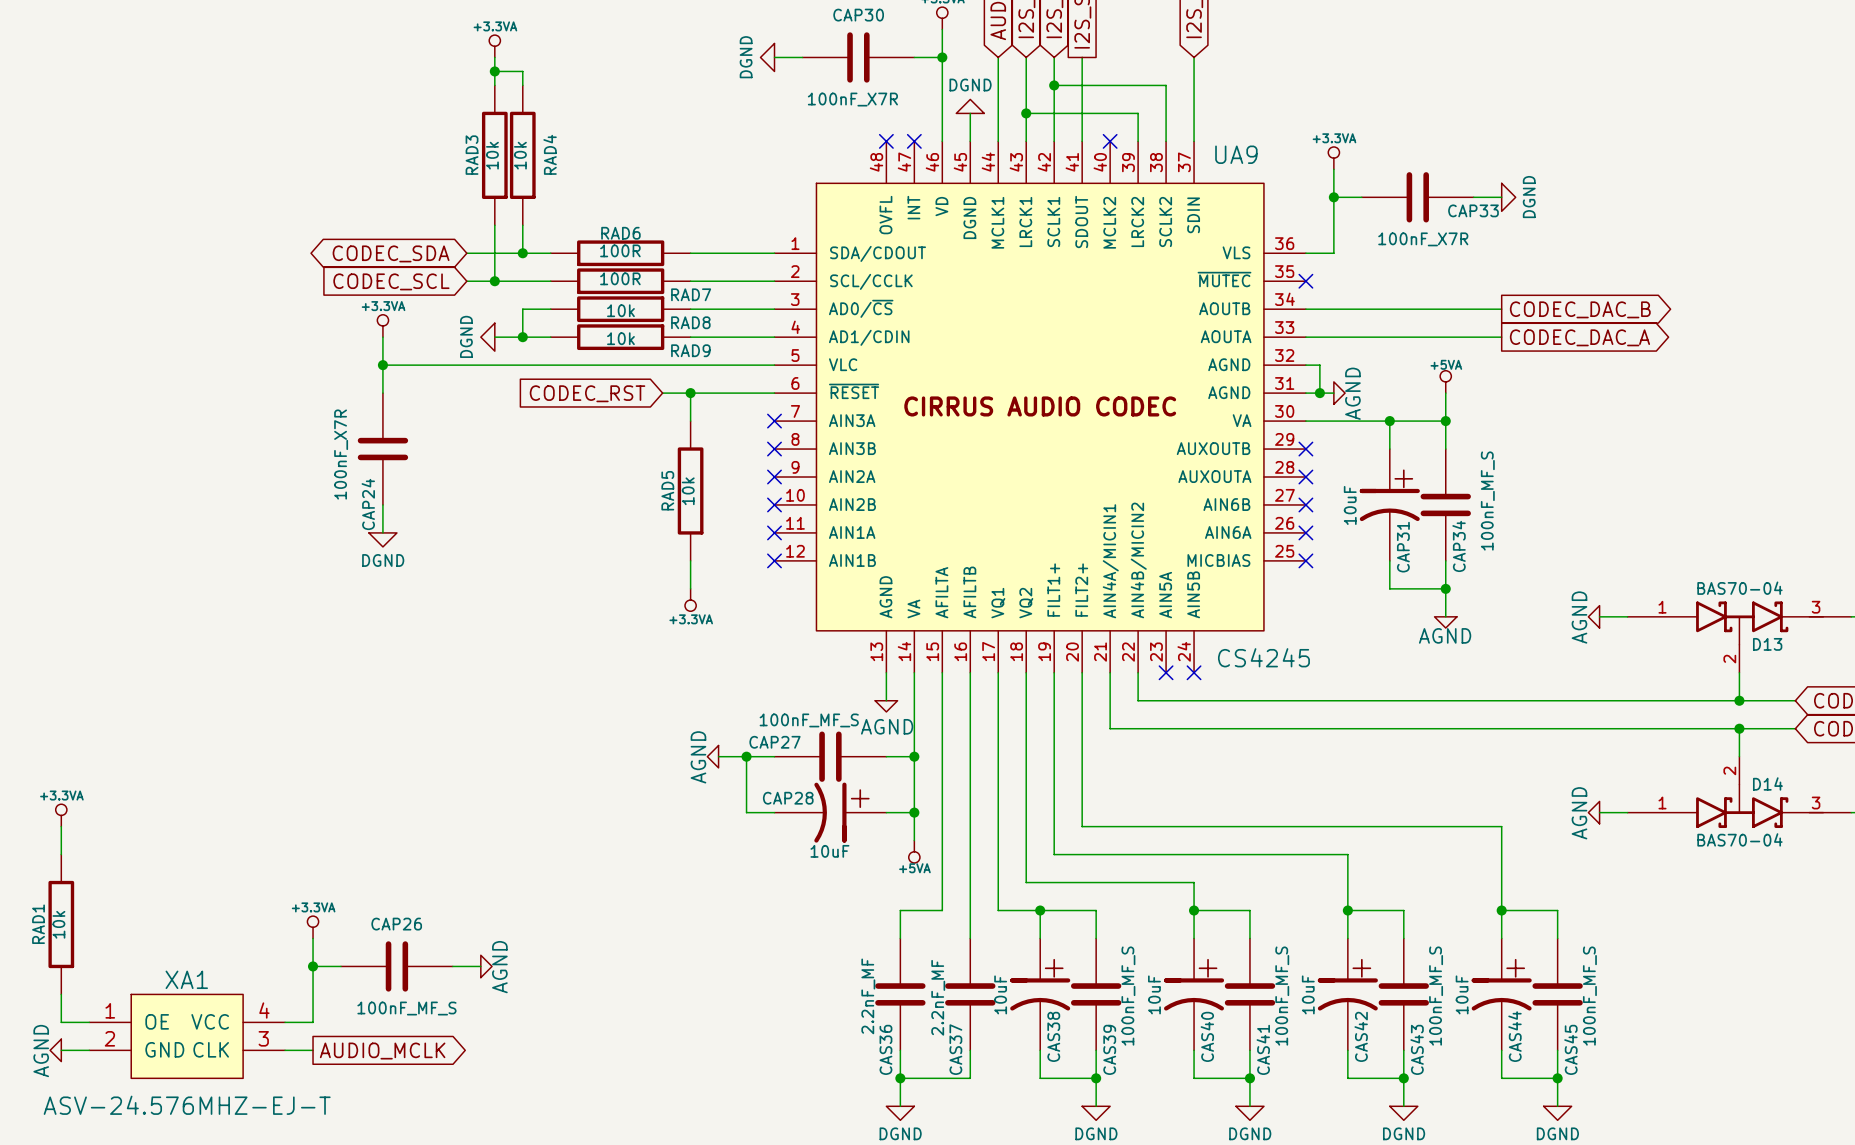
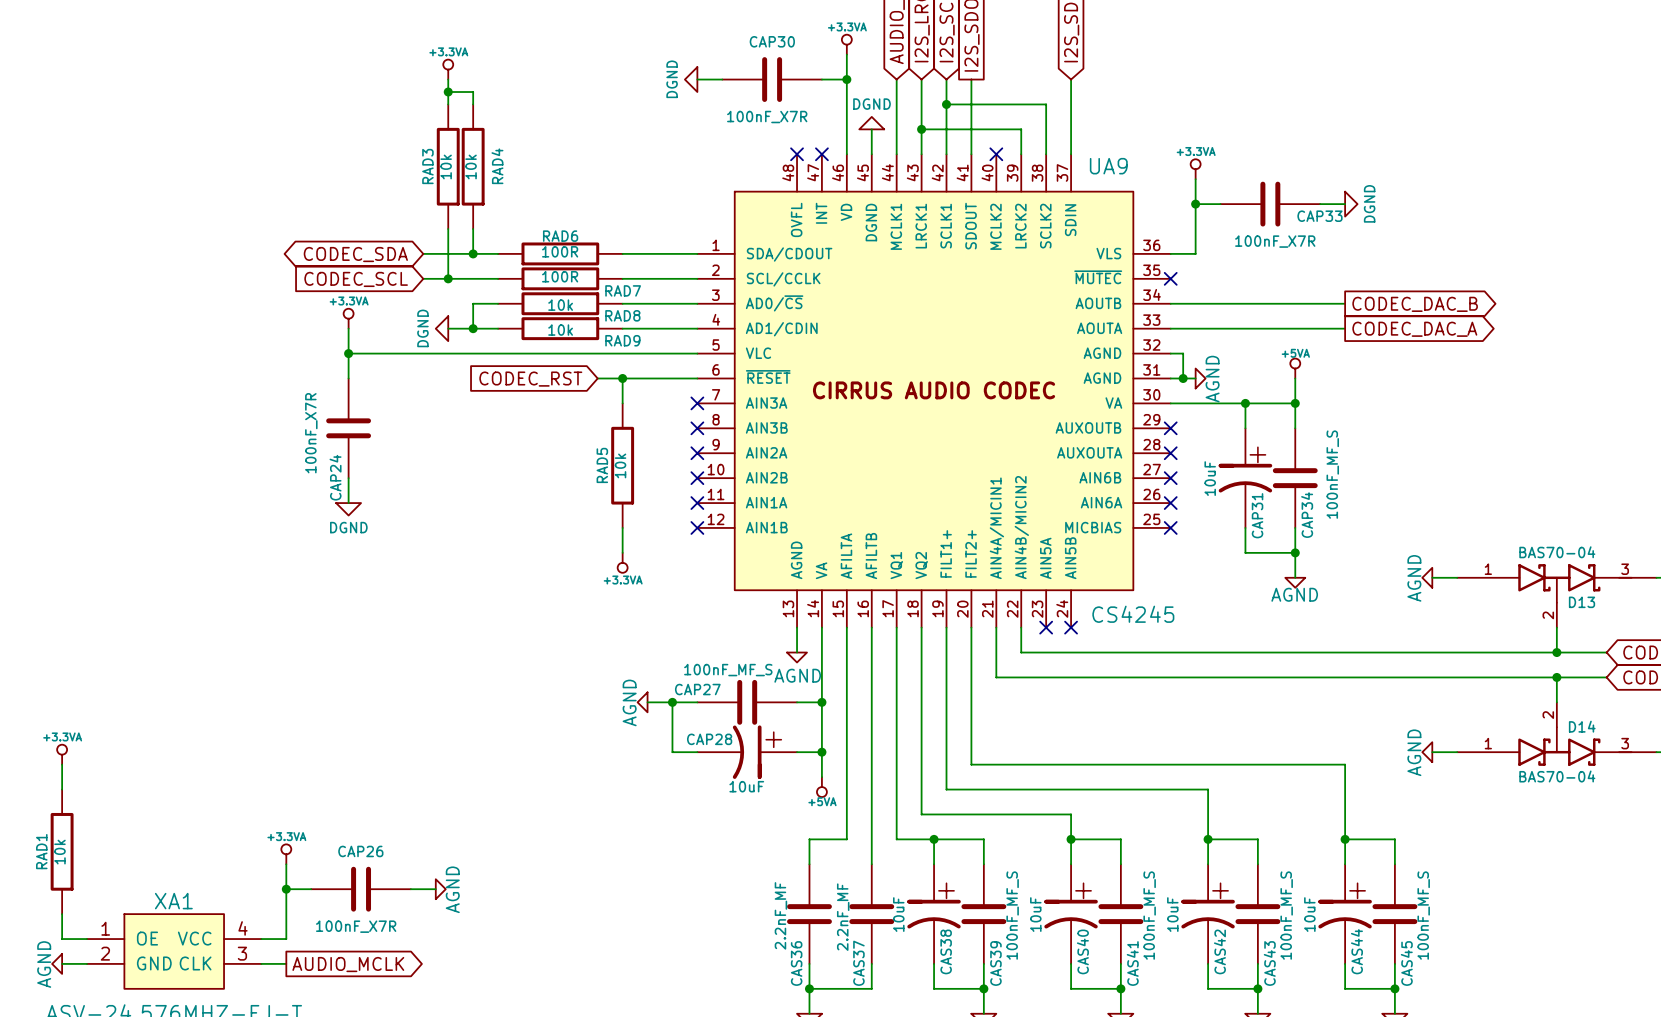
CAP26 value: 100nF_MF_S (406, 1008) -> 100nF_X7R (356, 926)

